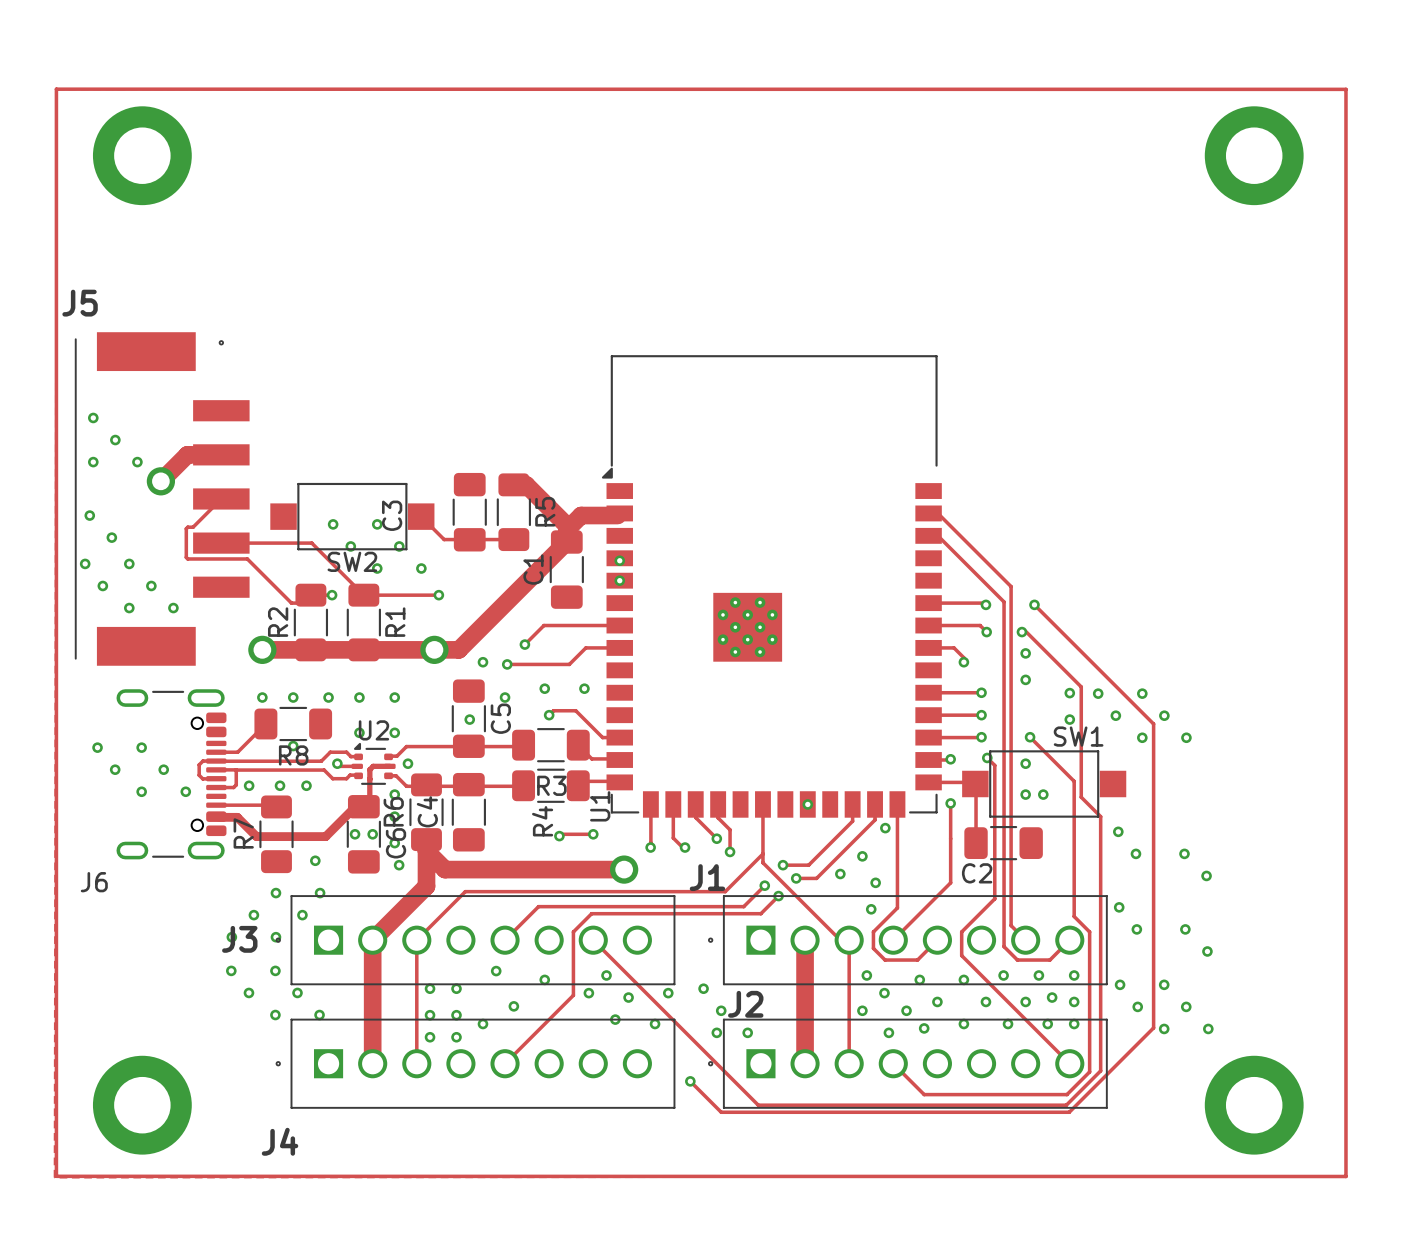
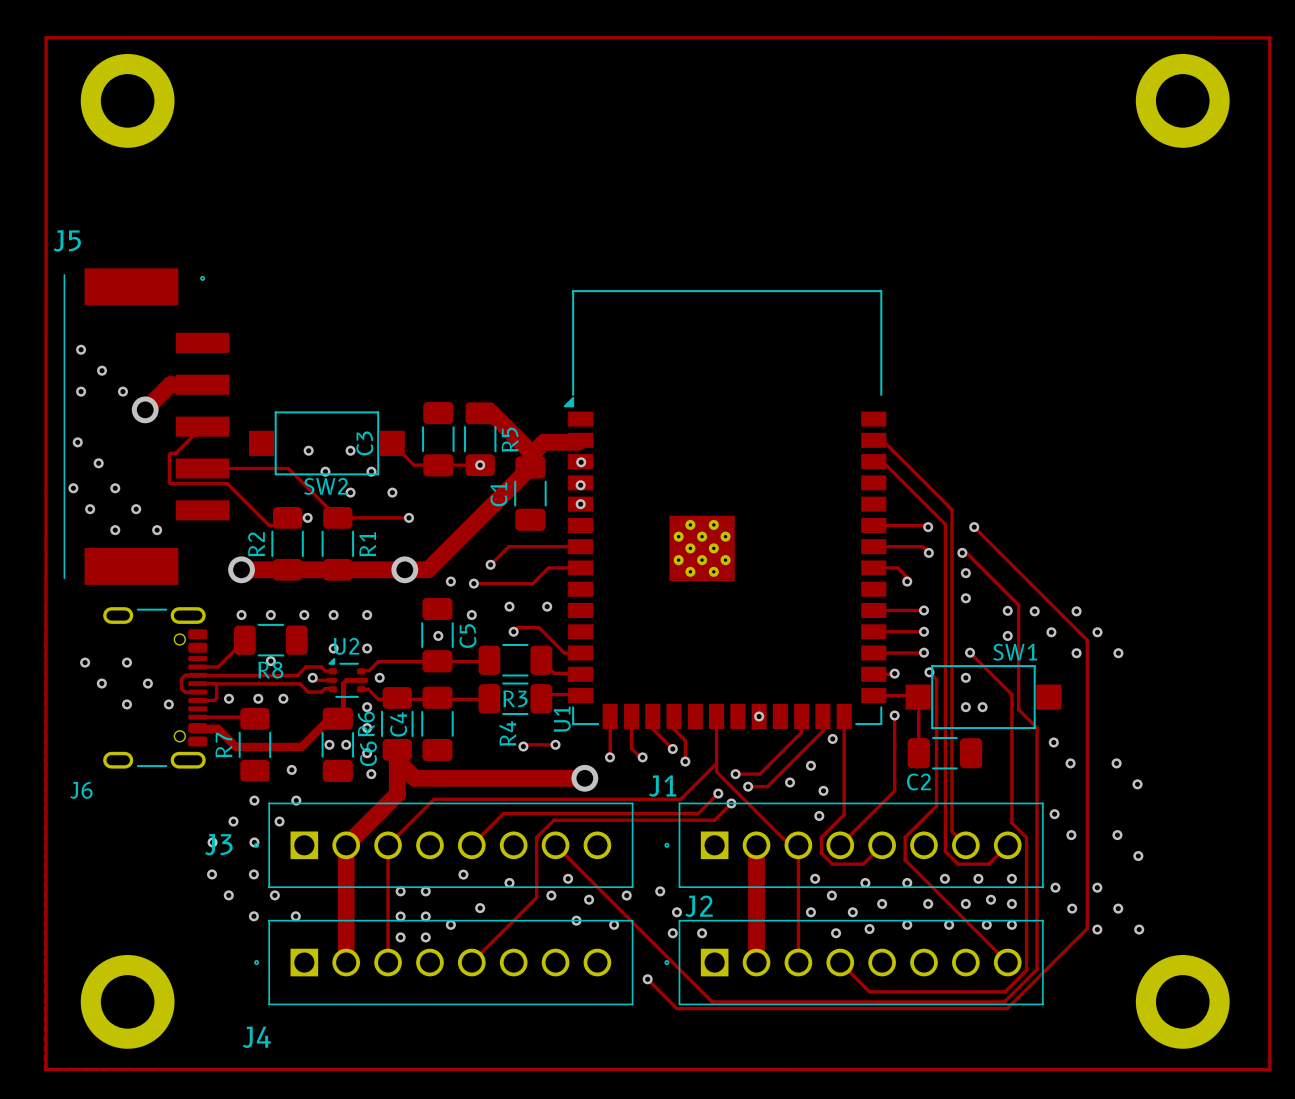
via: none -> (581, 462)
via: none -> (480, 465)

